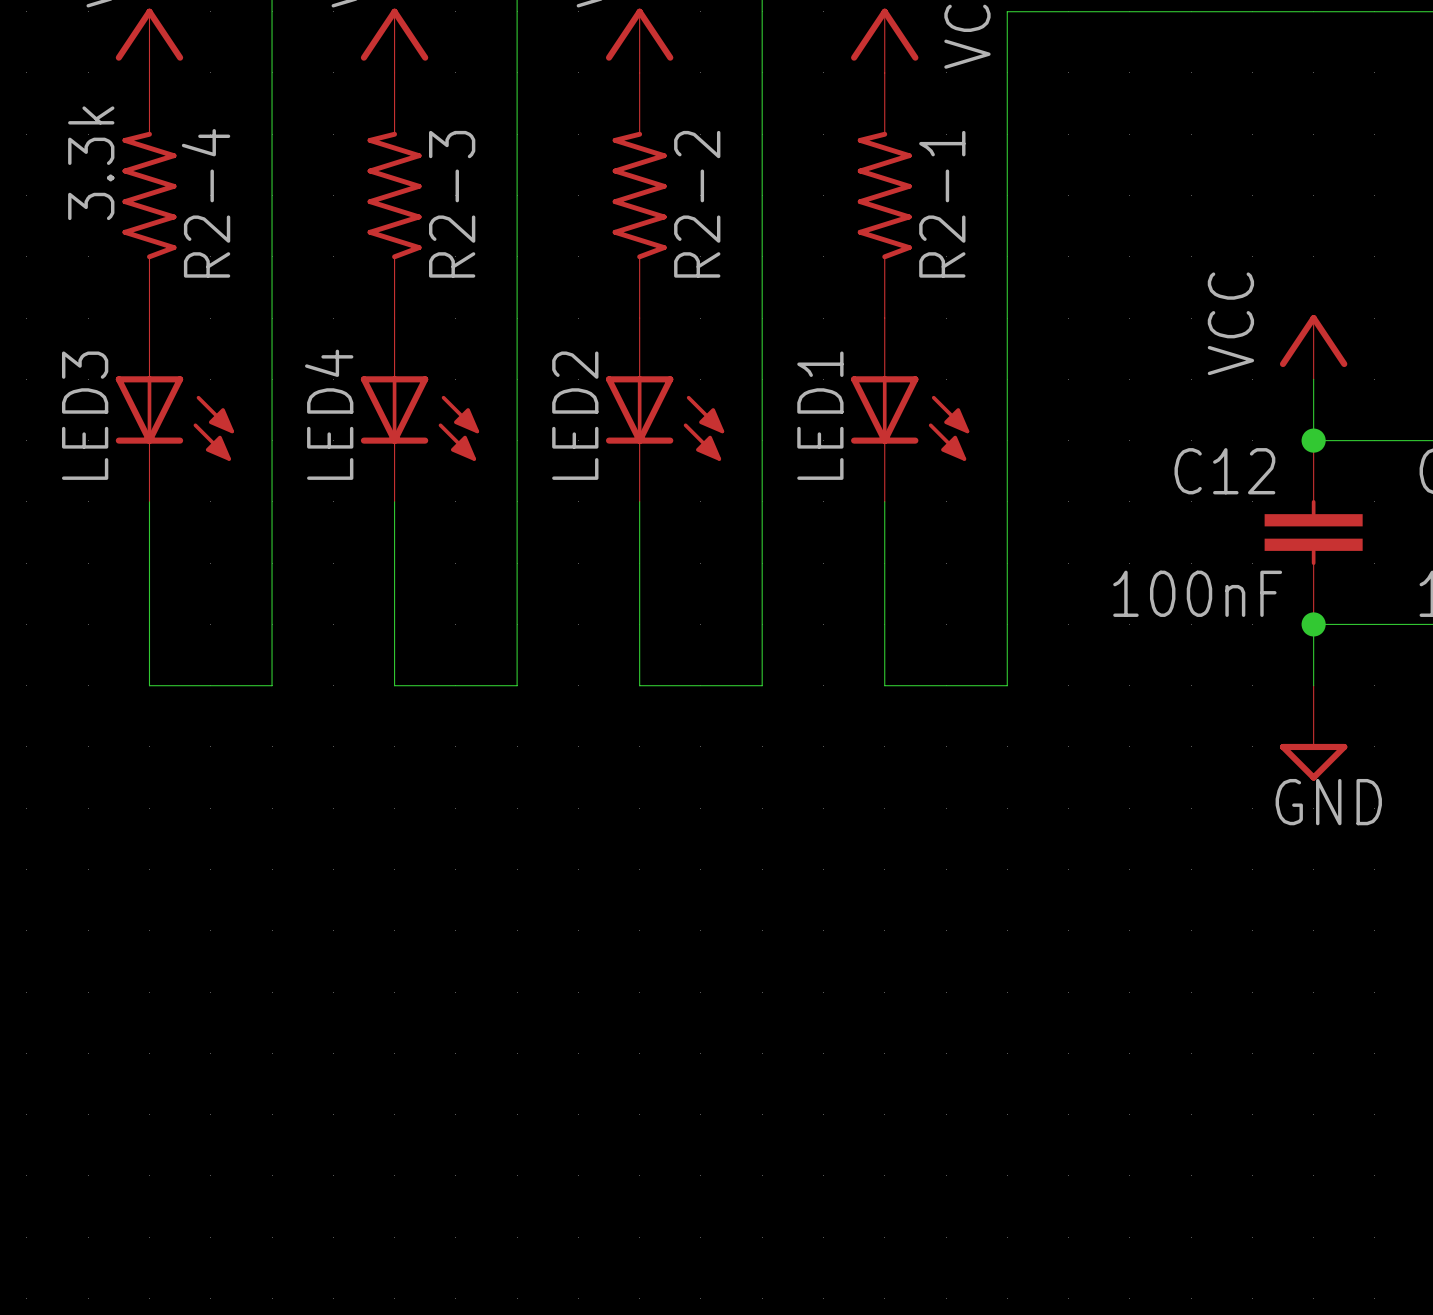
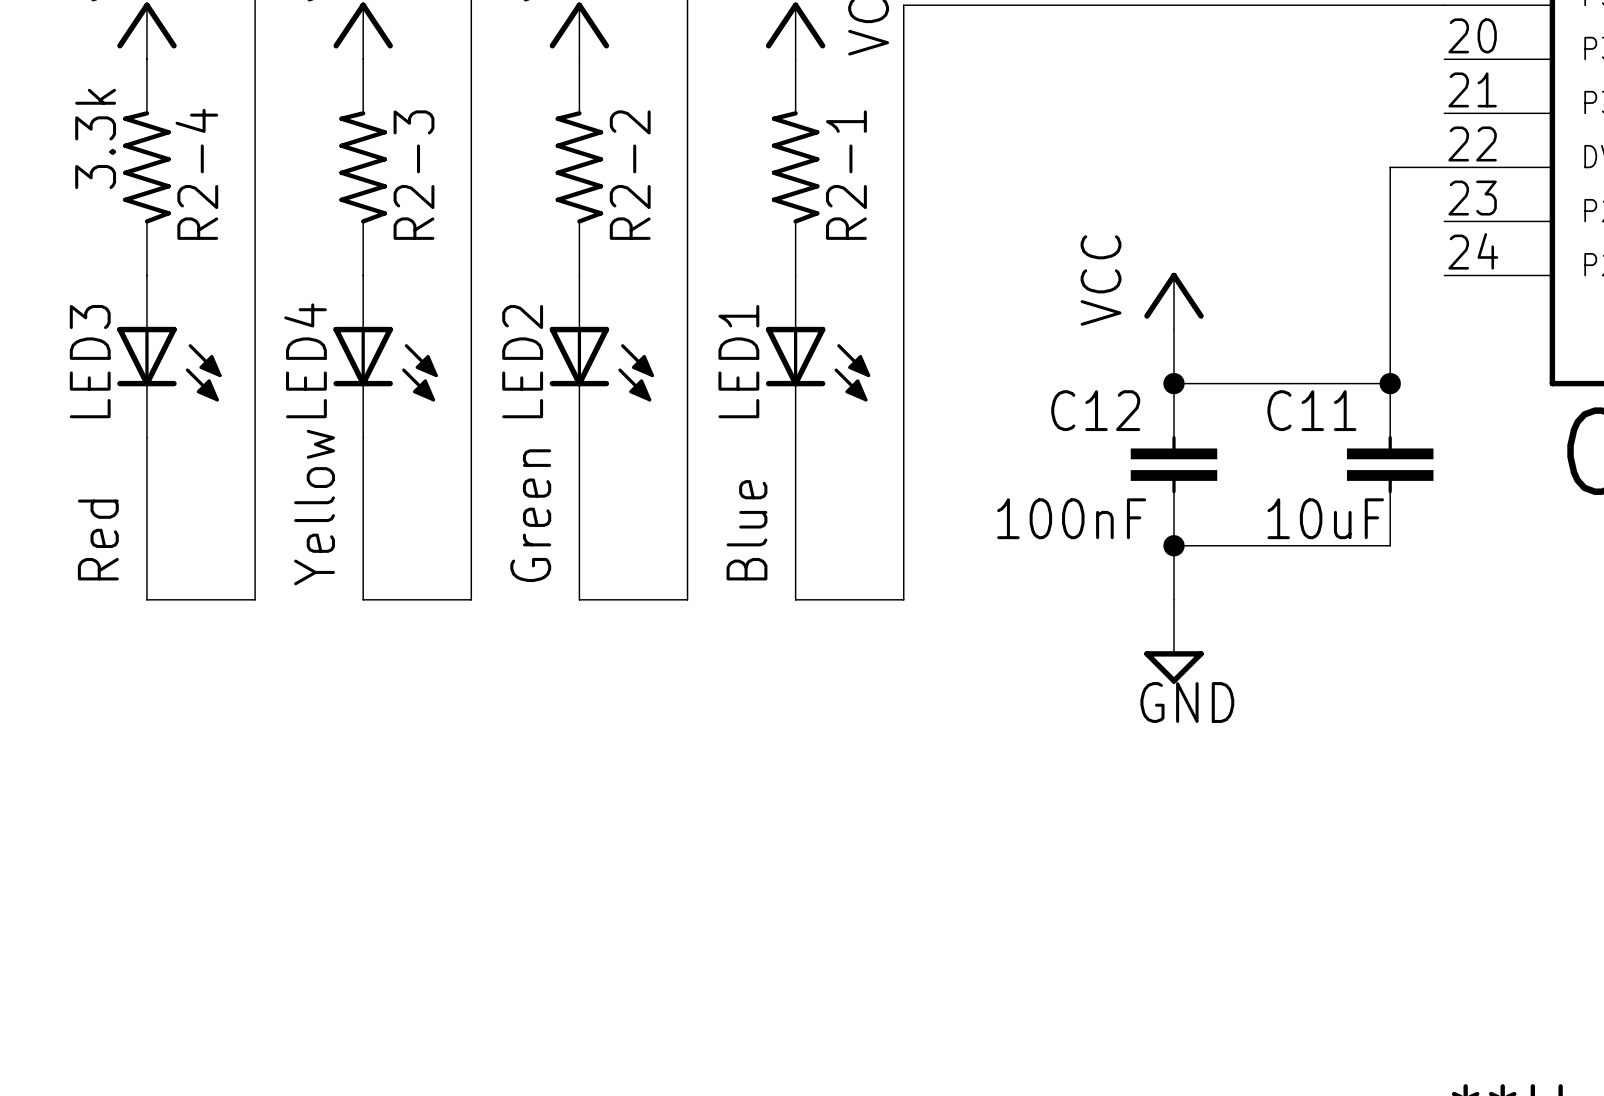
LED4 value: none -> Yellow (314, 507)
LED2 value: none -> Green (530, 515)
LED1 value: none -> Blue (746, 530)
LED3 value: none -> Red (98, 539)

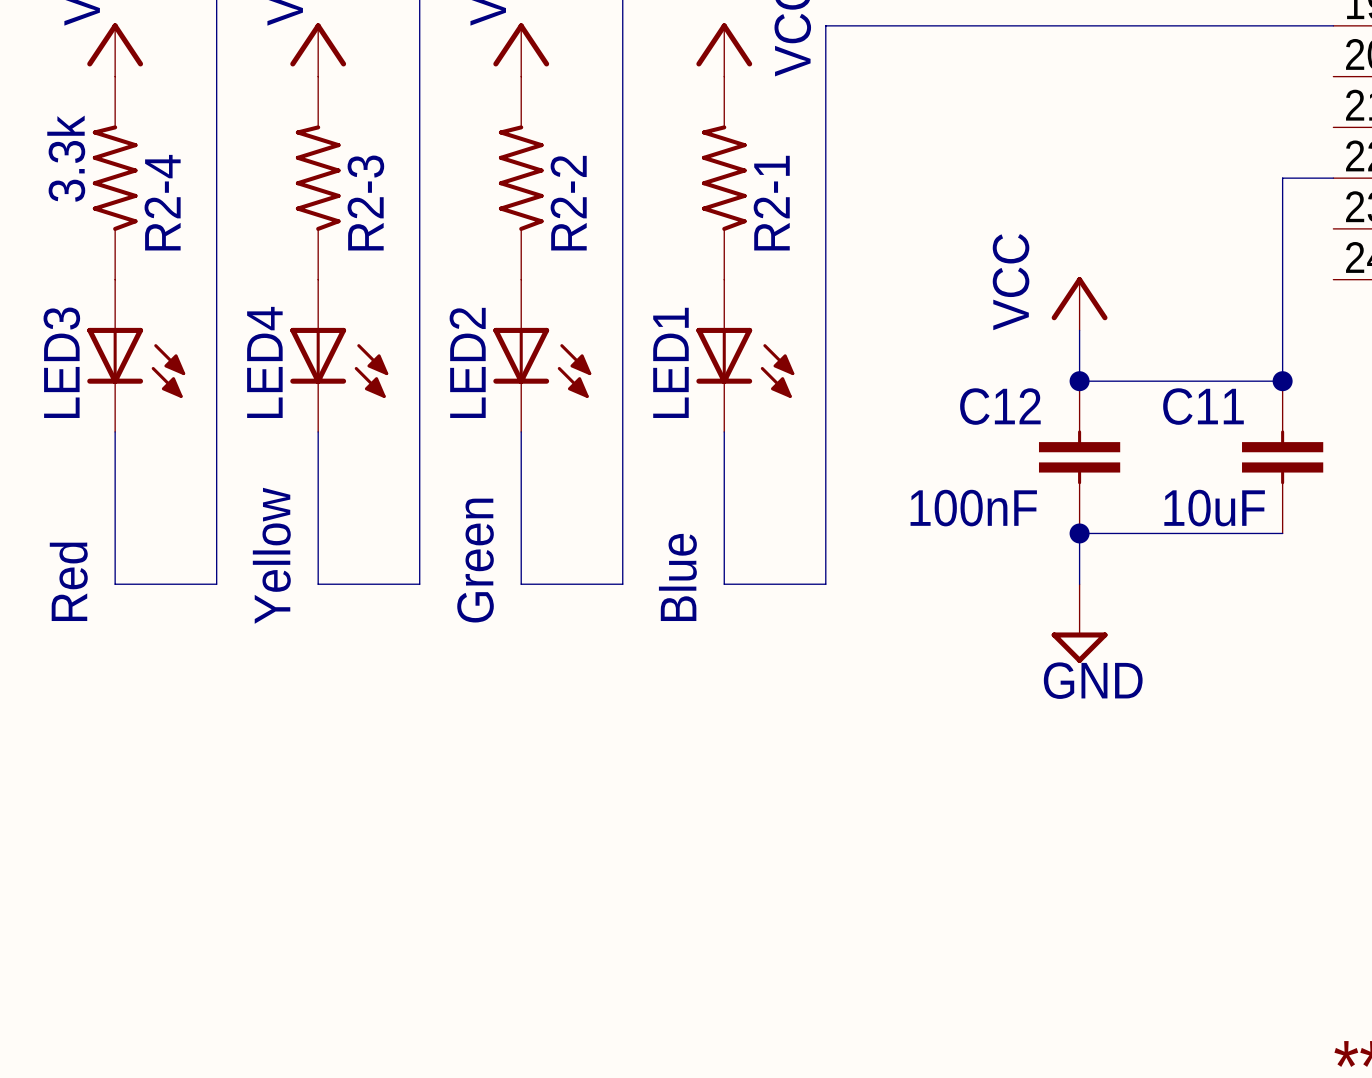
LED4 value position: Yellow (314, 507) -> Yellow (271, 555)
LED2 value position: Green (530, 515) -> Green (475, 560)
LED1 value position: Blue (746, 530) -> Blue (677, 577)
LED3 value position: Red (98, 539) -> Red (68, 581)

